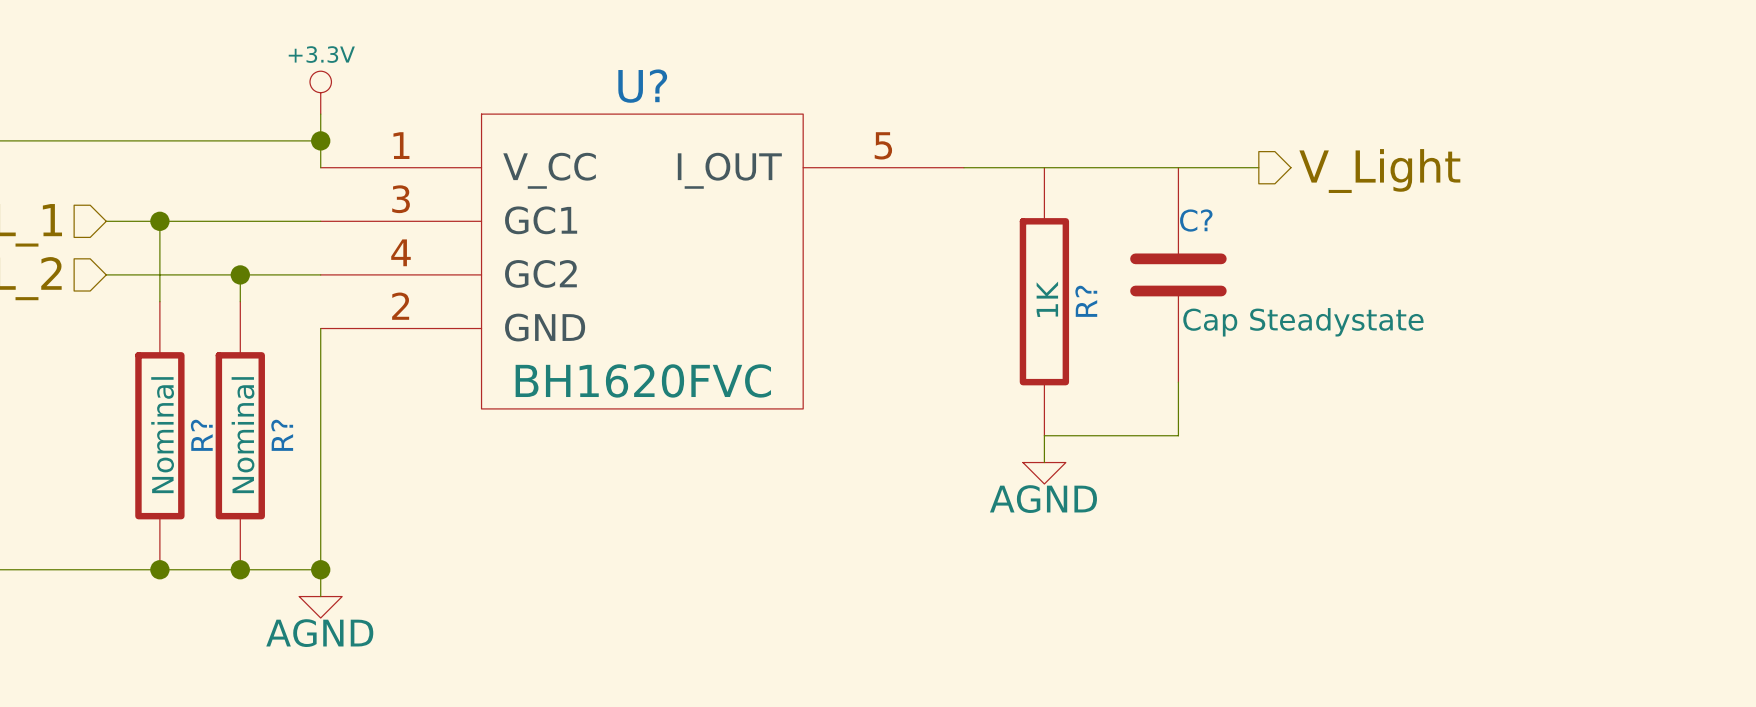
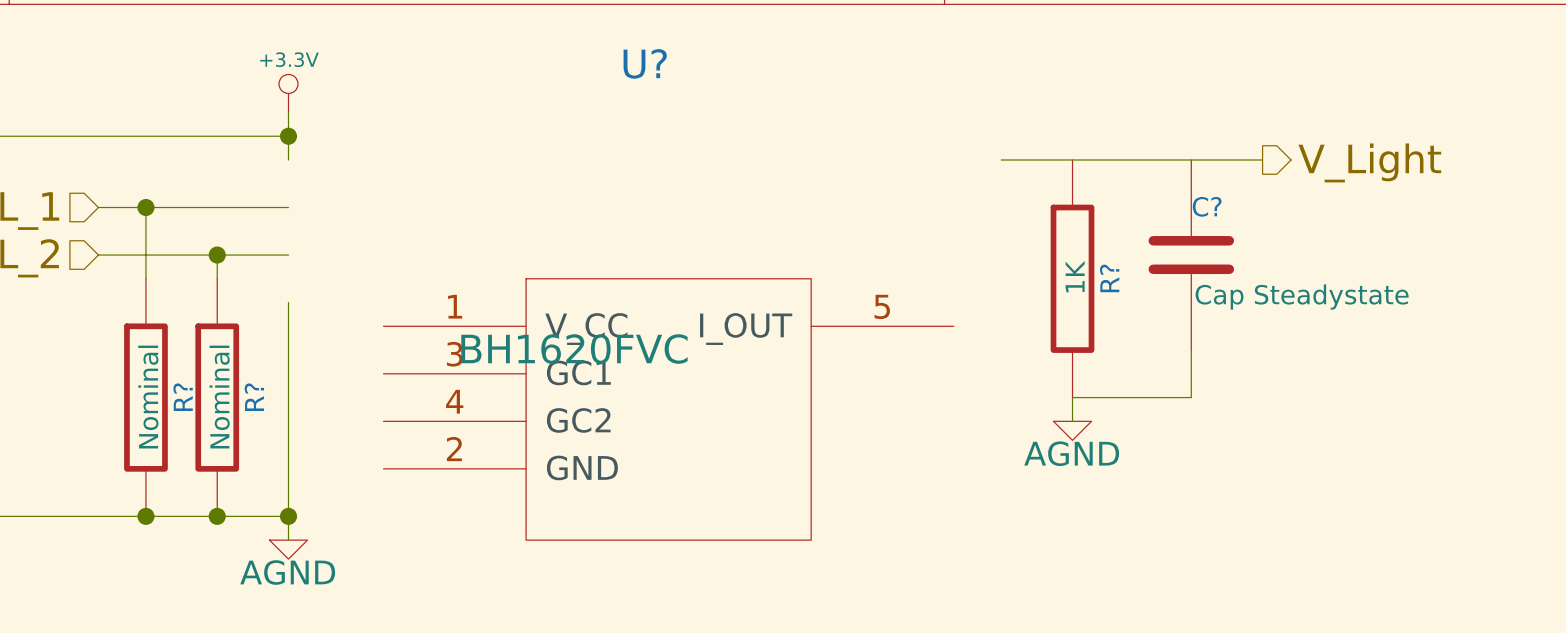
U? name position: U? (642, 86) -> U? (645, 63)
wire: (963, 167) (1124, 167) -> (1120, 160) (1262, 160)
hierarchical label position: V_Light (1379, 171) -> V_Light (1369, 162)
U? position: (642, 261) -> (668, 409)
C? position: (1178, 274) -> (1191, 255)
R? position: (1044, 301) -> (1072, 278)
wire: (1178, 382) (1178, 435) (1044, 435) (1044, 462) -> (1191, 350) (1191, 397) (1072, 397) (1072, 421)
power symbol position: AGND (1044, 473) -> AGND (1072, 430)

